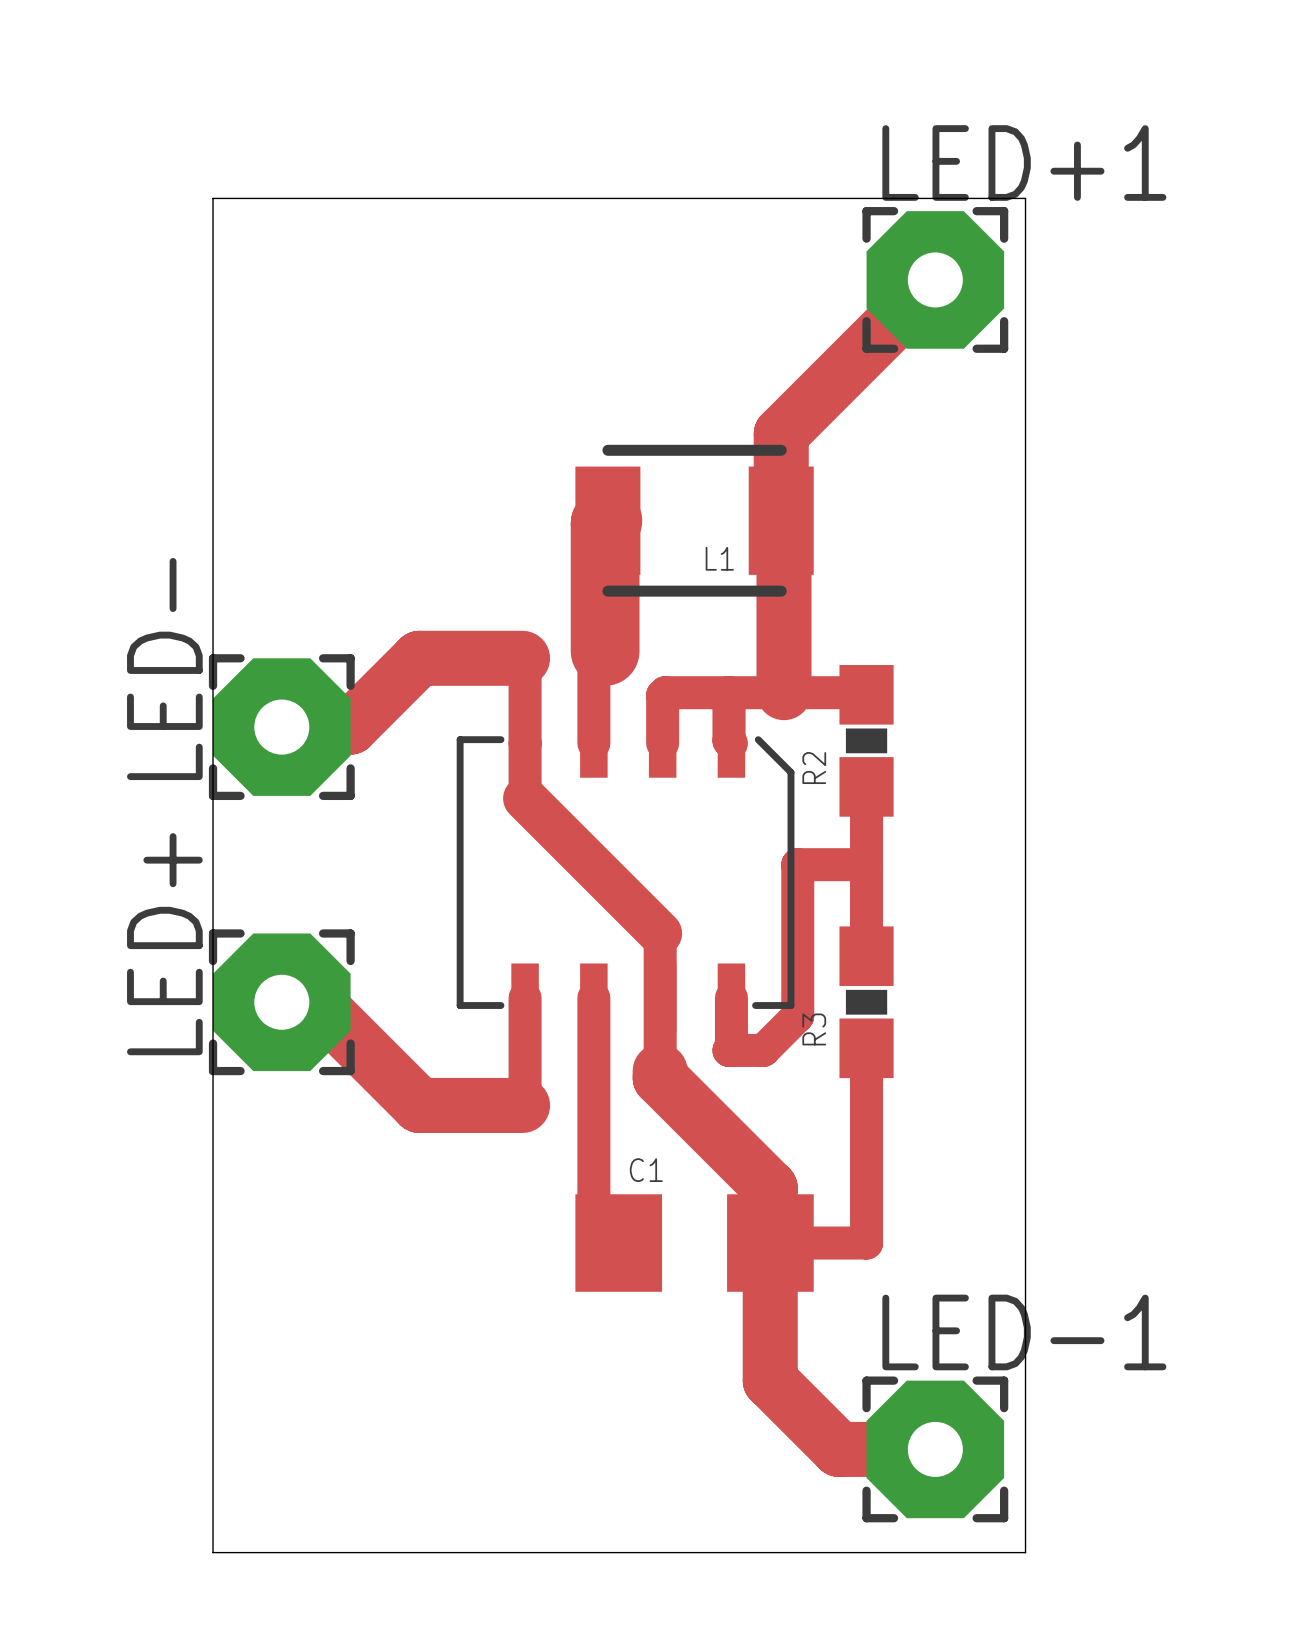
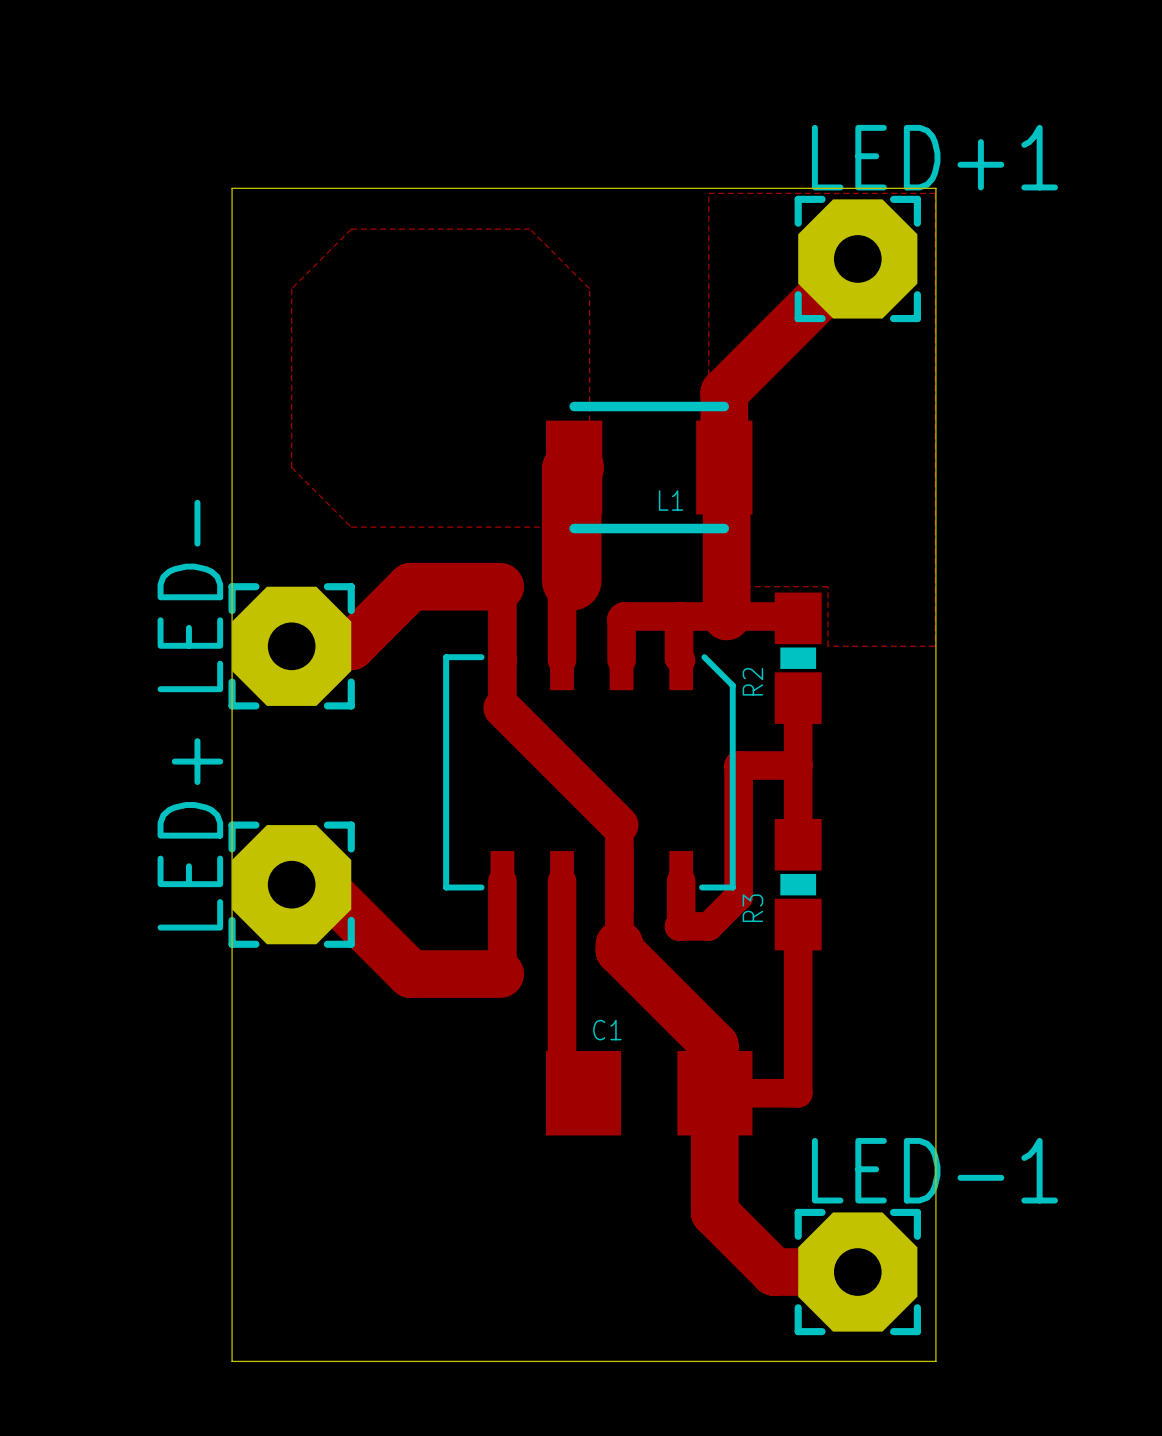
zone outline: none -> (708, 193) (708, 586) (828, 586) (828, 646) (935, 646) (935, 193) (708, 193)
zone outline: none -> (351, 229) (530, 229) (589, 288) (589, 527) (351, 527) (291, 467) (291, 288) (351, 229)

